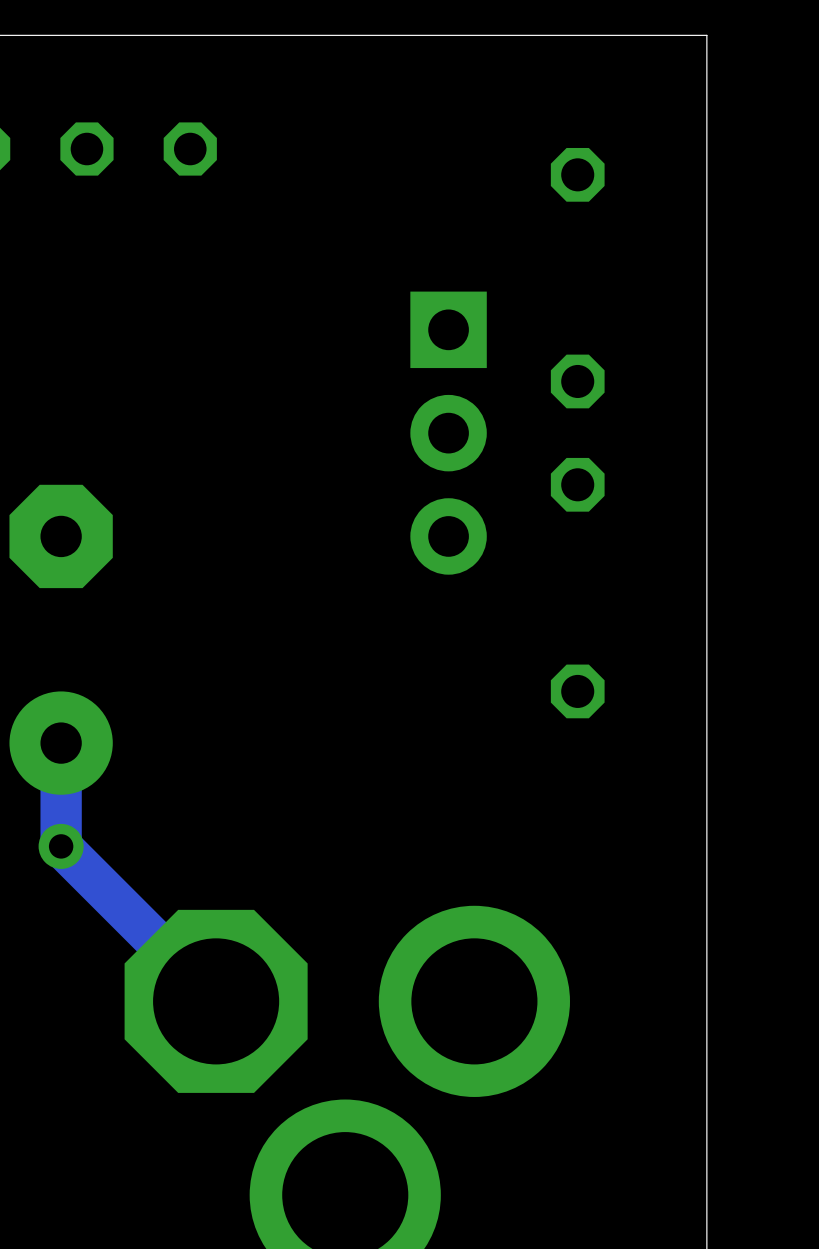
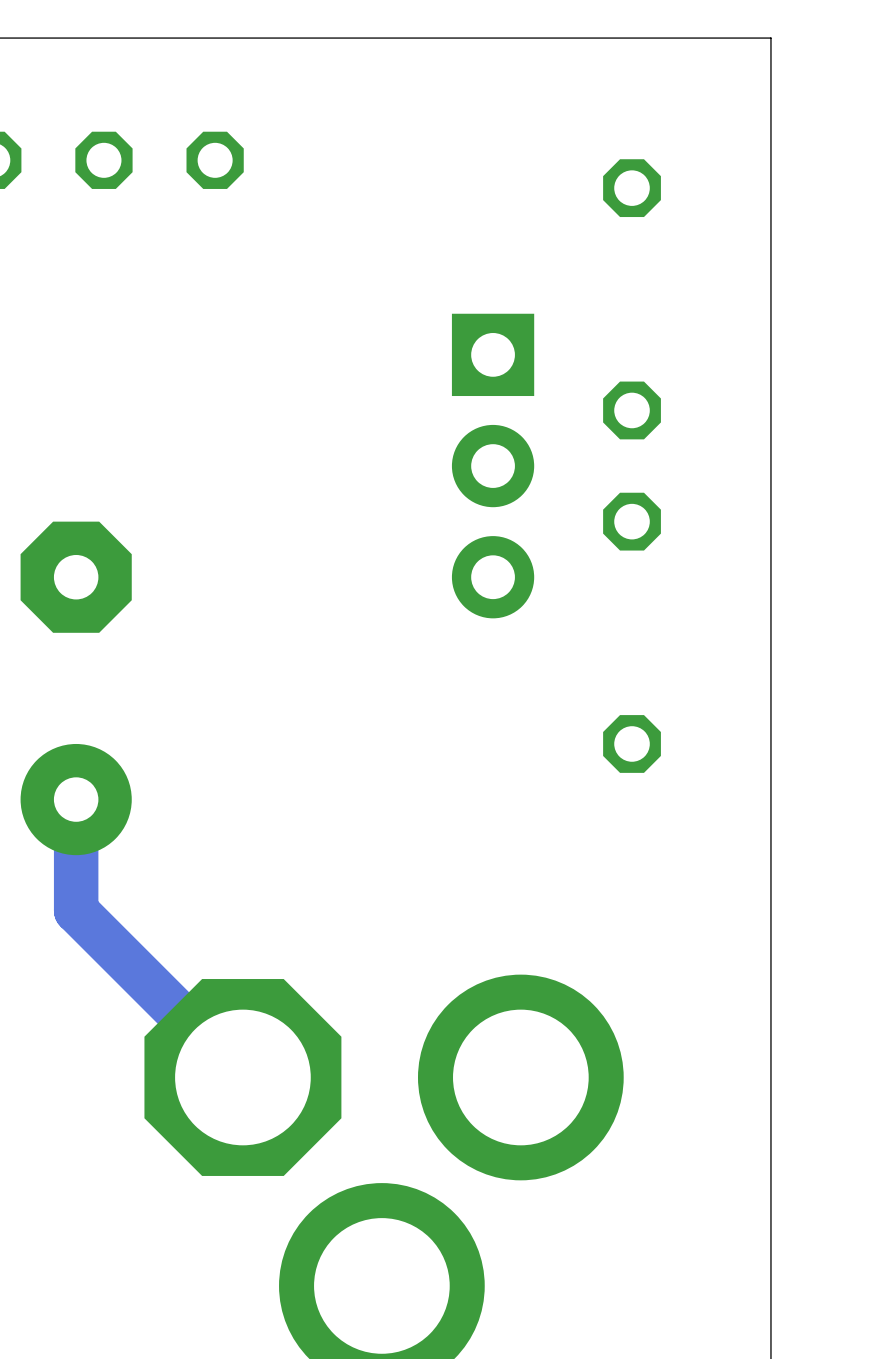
via: (61, 846) -> none

